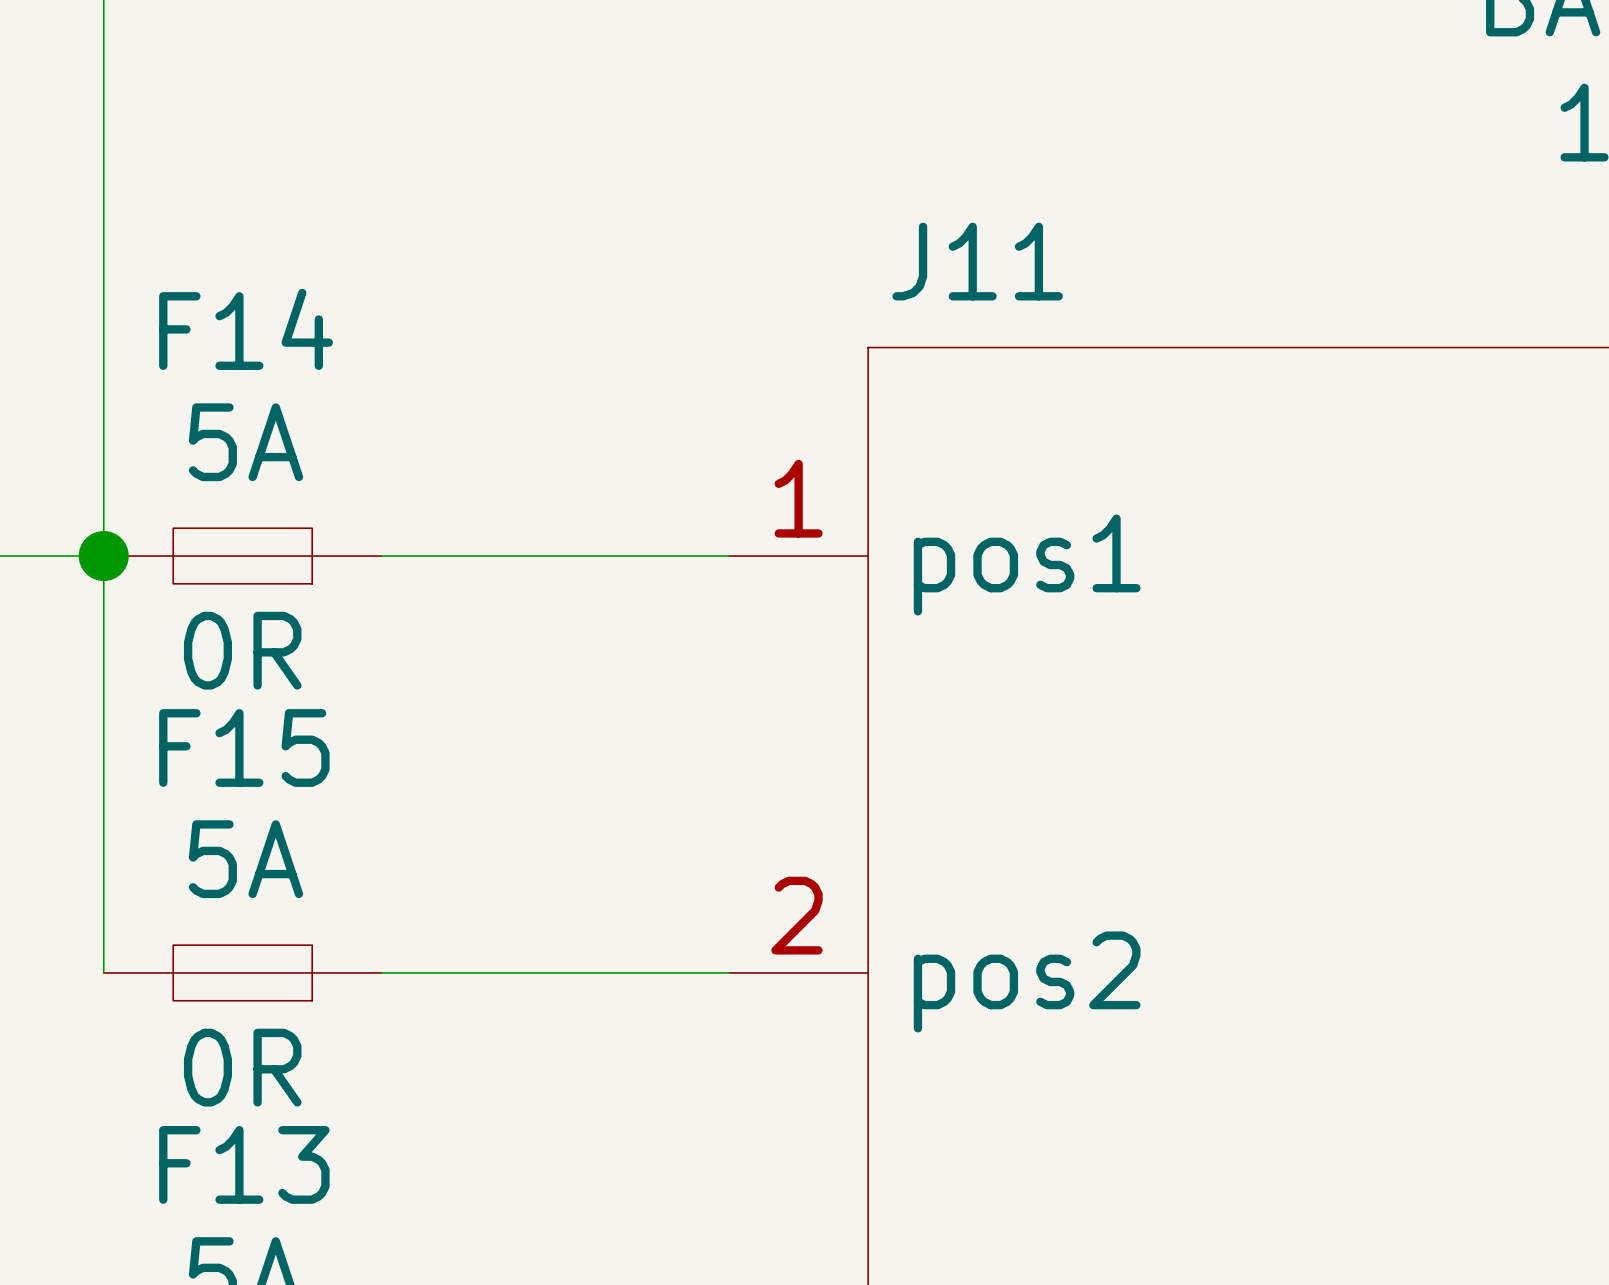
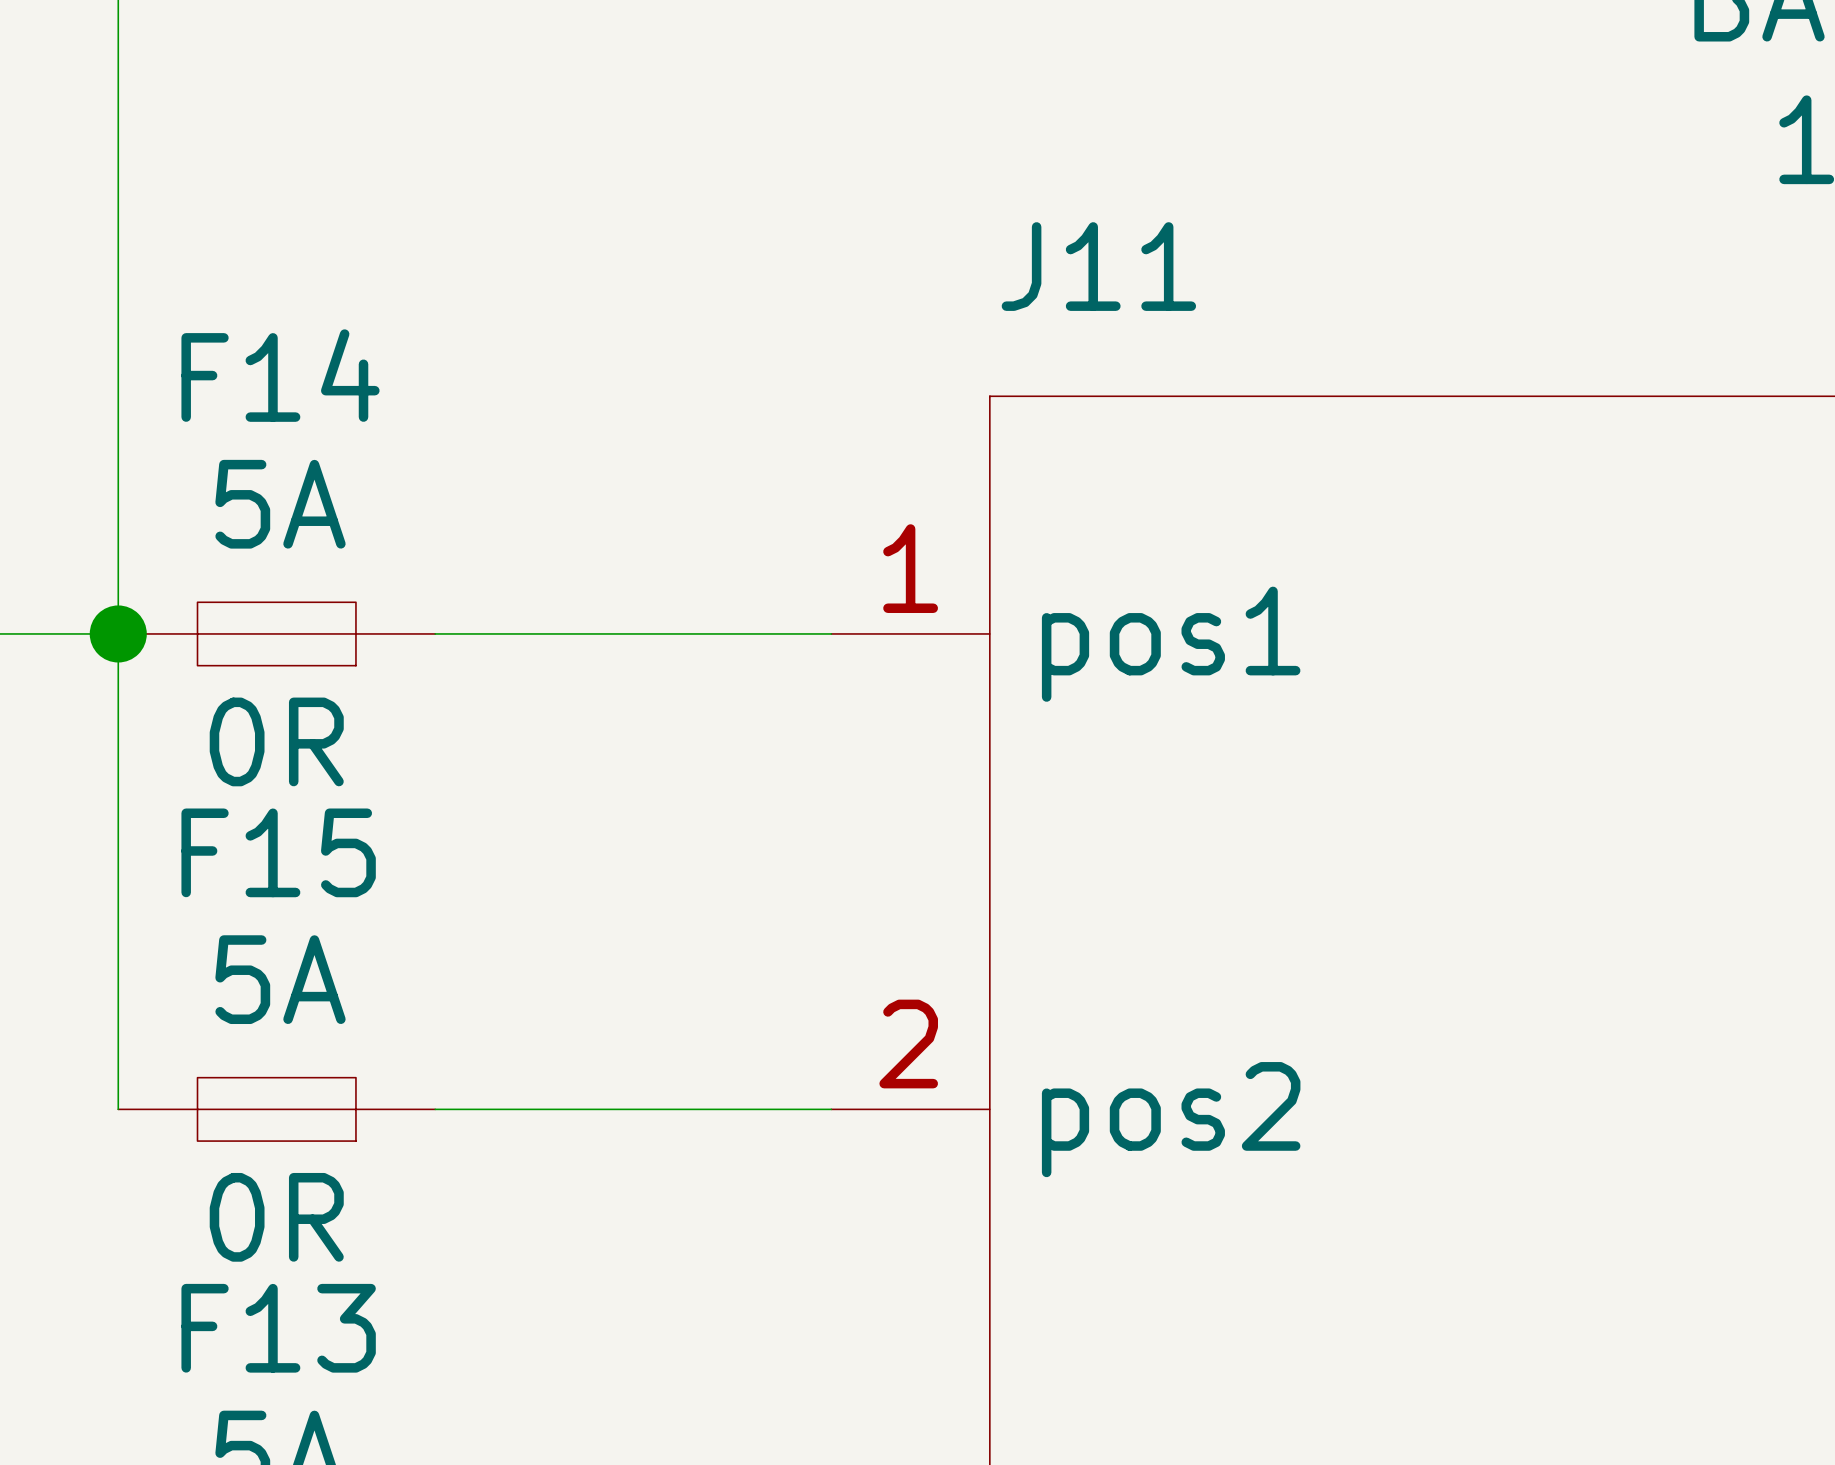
J11 name position: J11 (977, 261) -> J11 (1098, 266)

